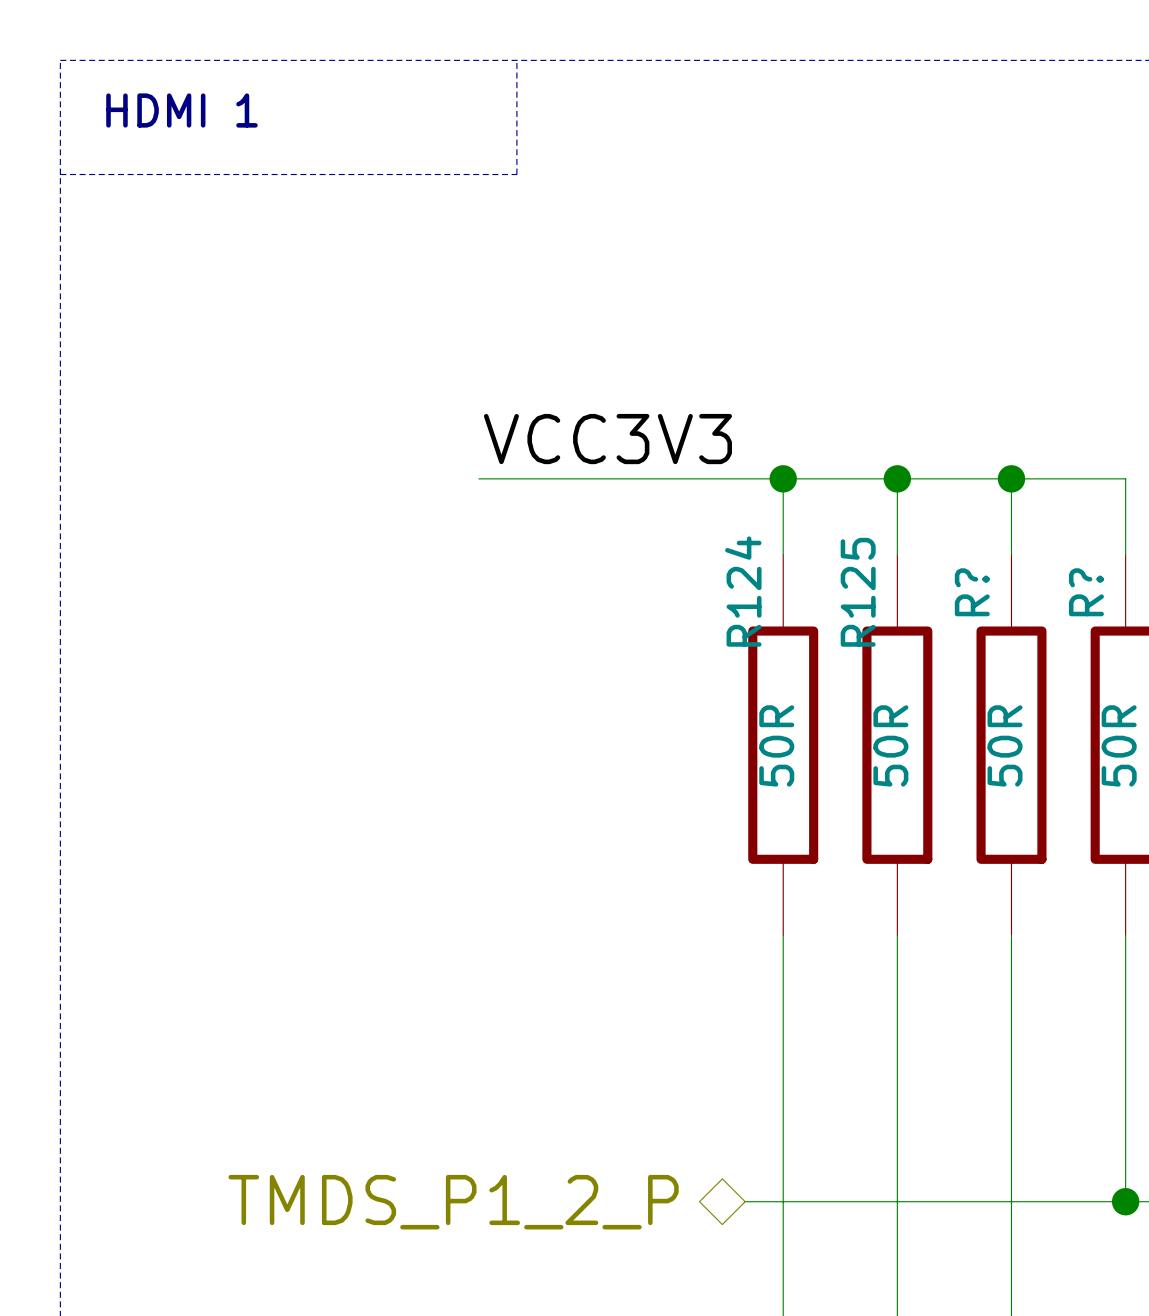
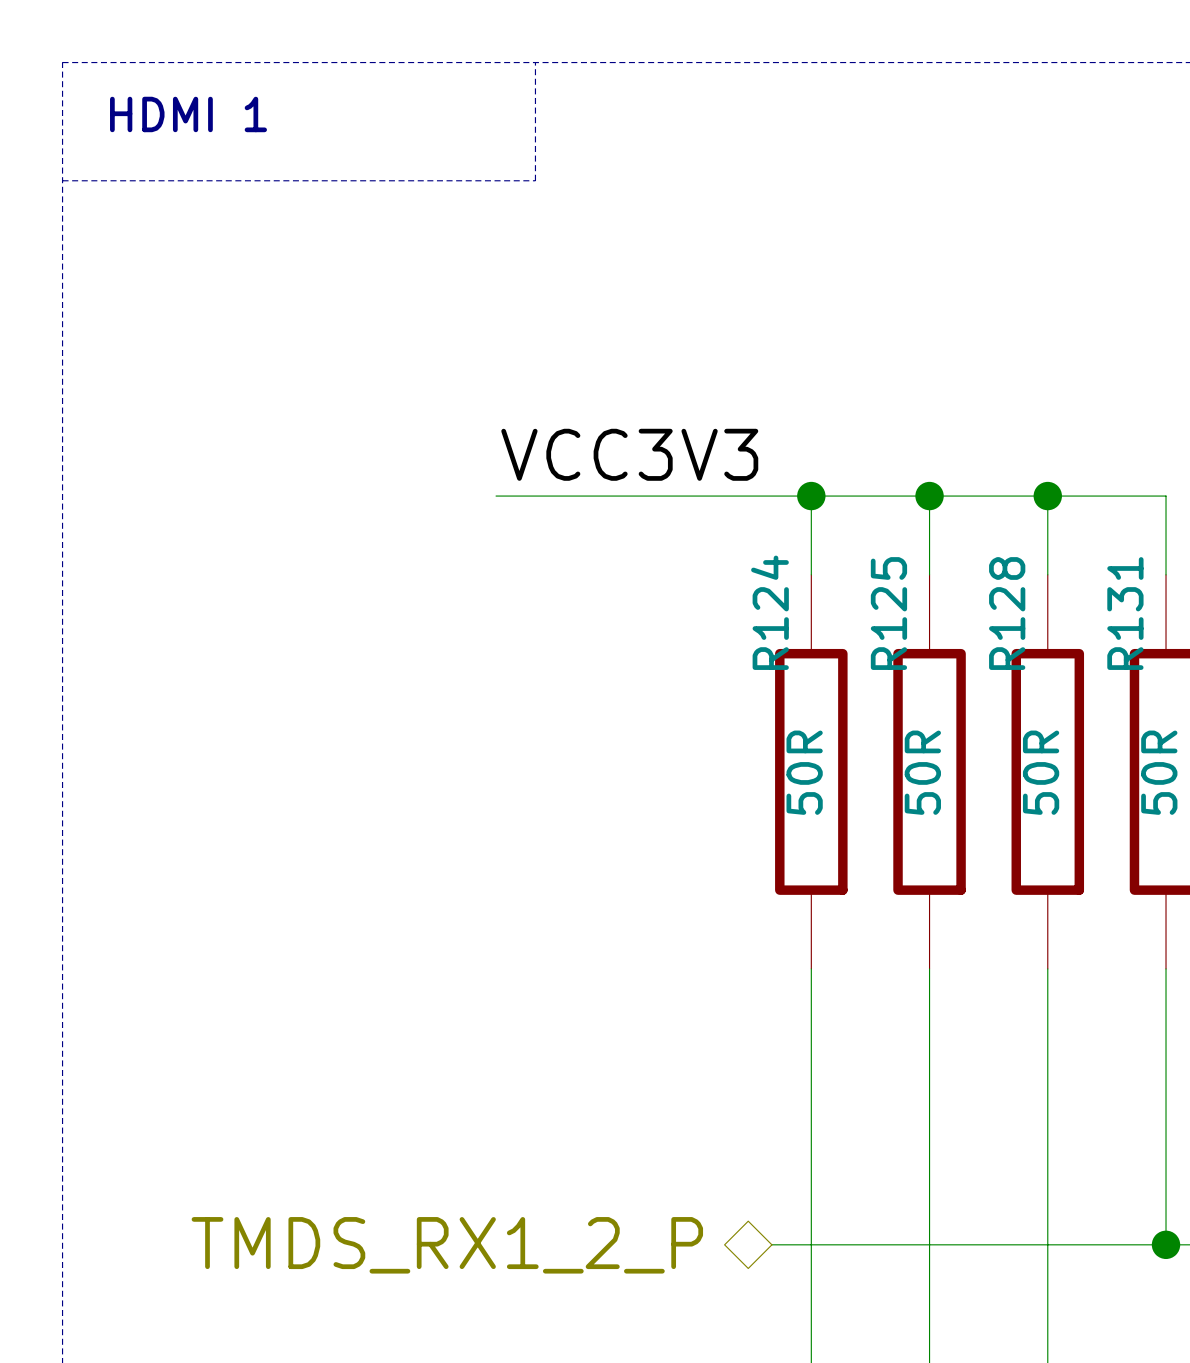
R? name: R? (972, 592) -> R128 (1007, 613)
R? name: R? (1086, 592) -> R131 (1125, 613)
hierarchical label: TMDS_P1_2_P (453, 1202) -> TMDS_RX1_2_P (447, 1245)

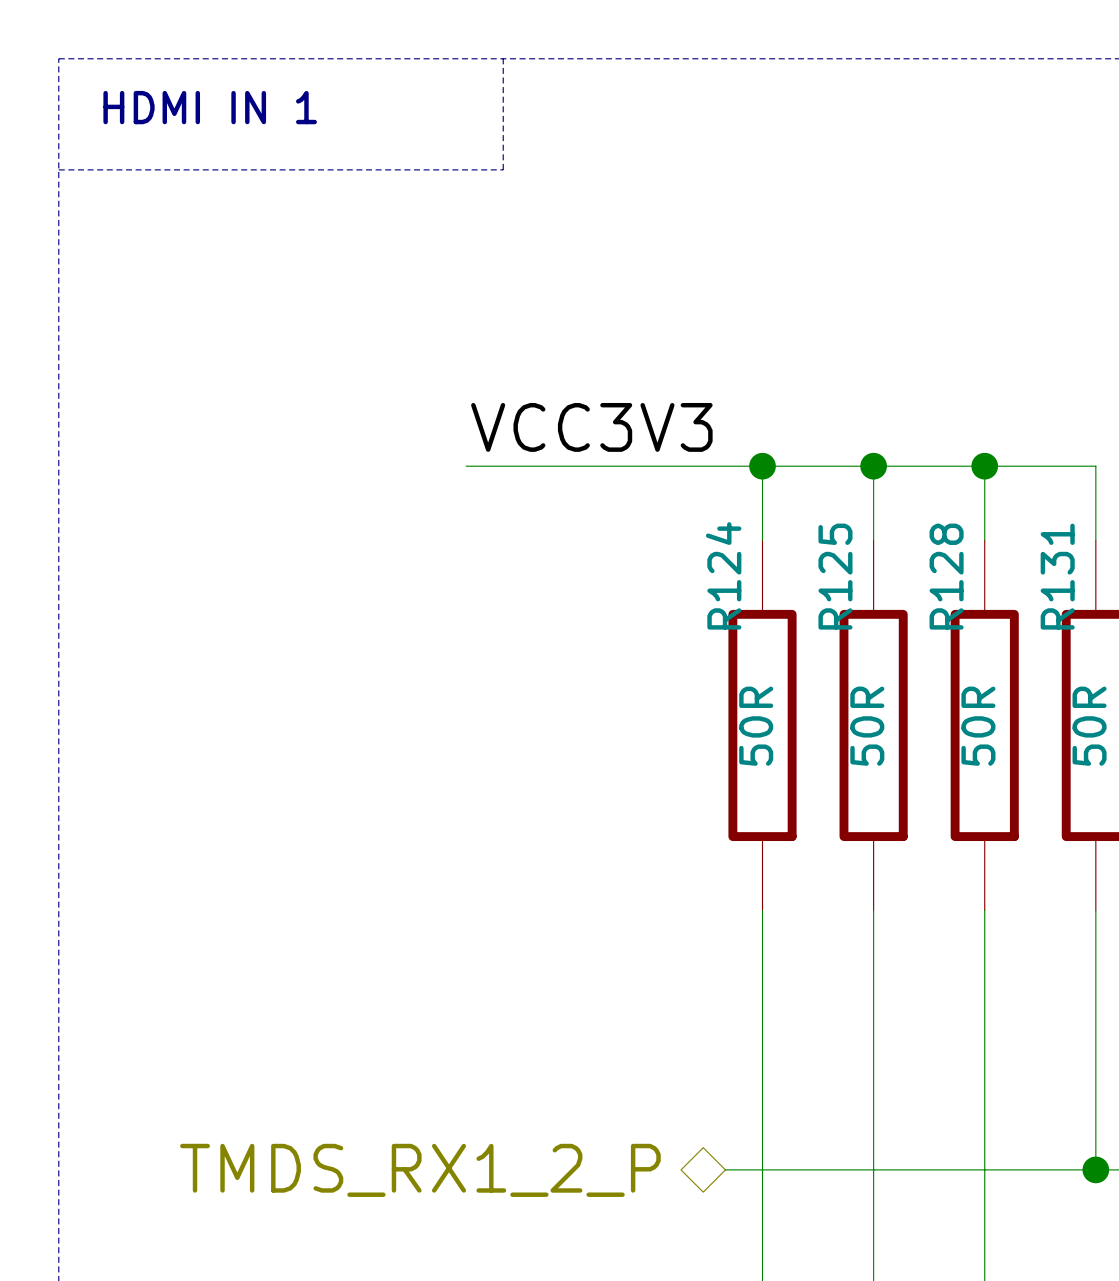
text: HDMI 1 (188, 114) -> HDMI IN 1 (210, 107)

